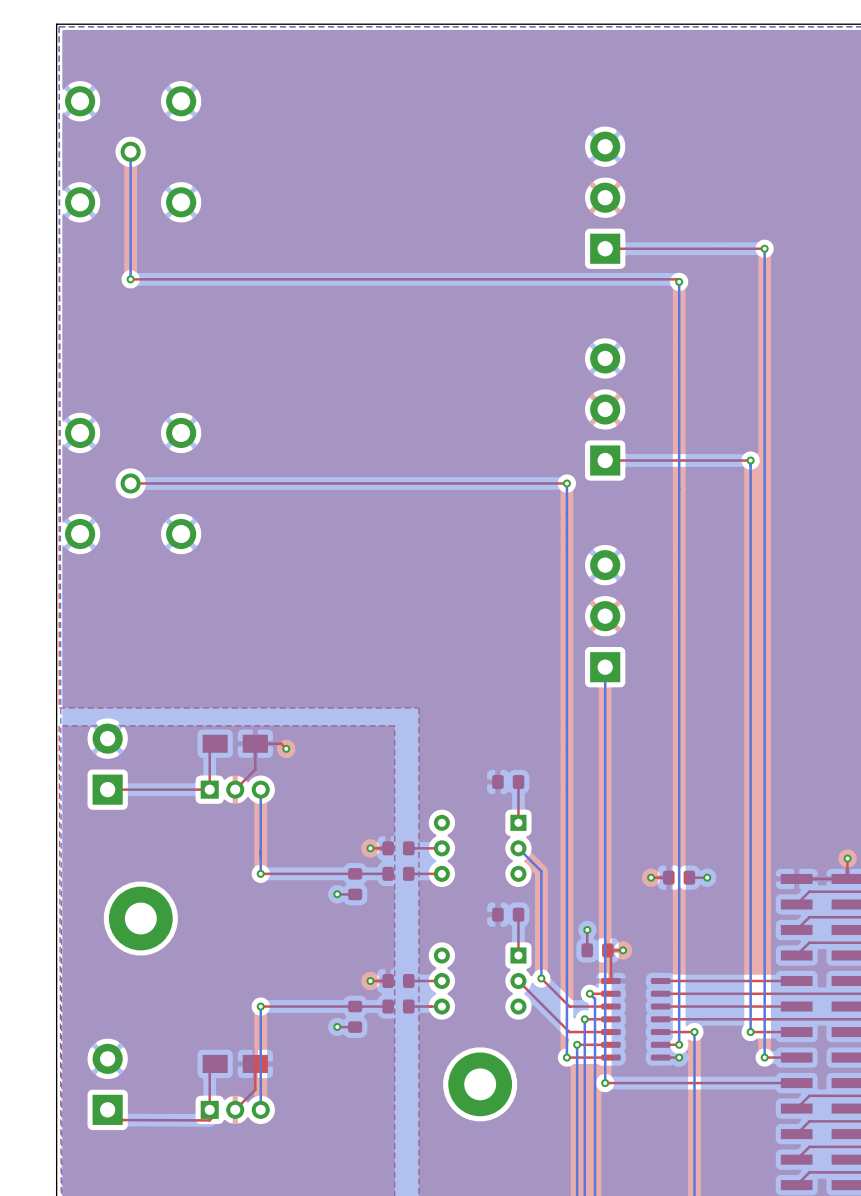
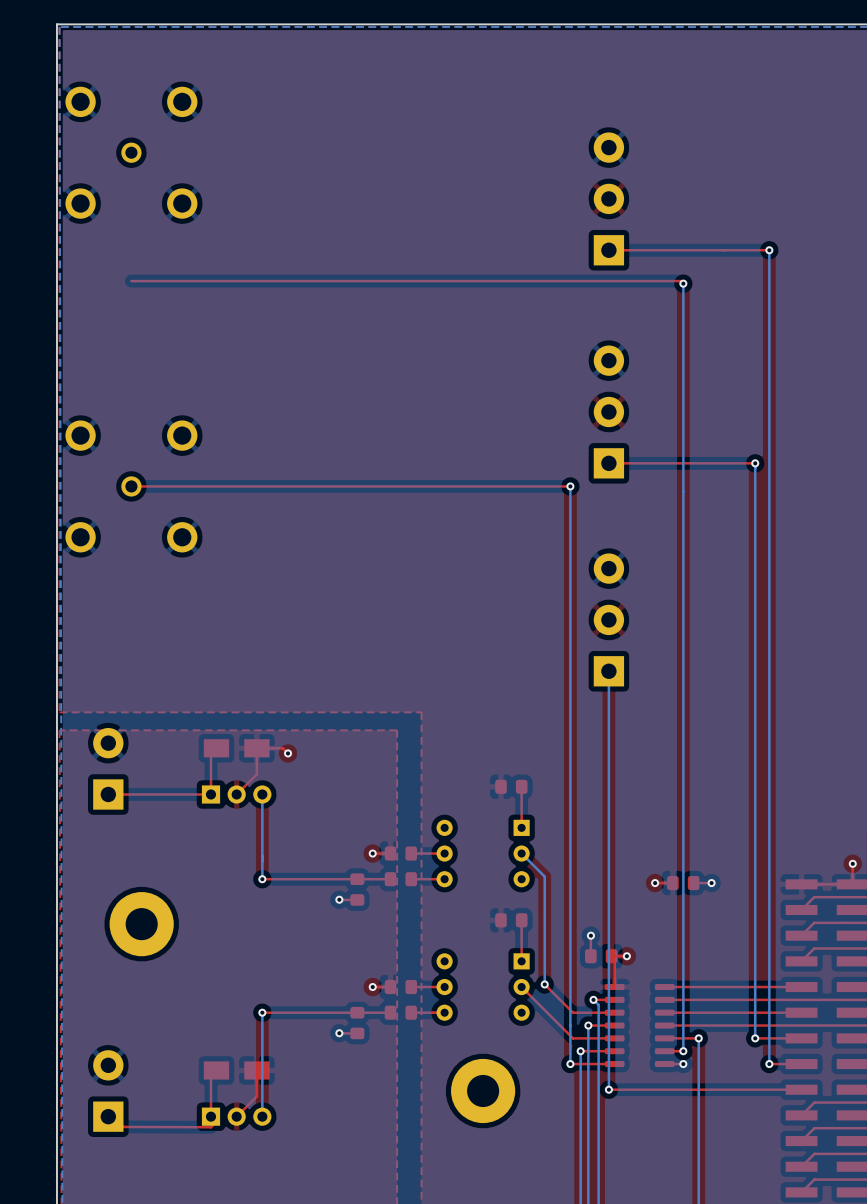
bottom track: (130, 151) (130, 279) -> none
via: (130, 279) -> none

